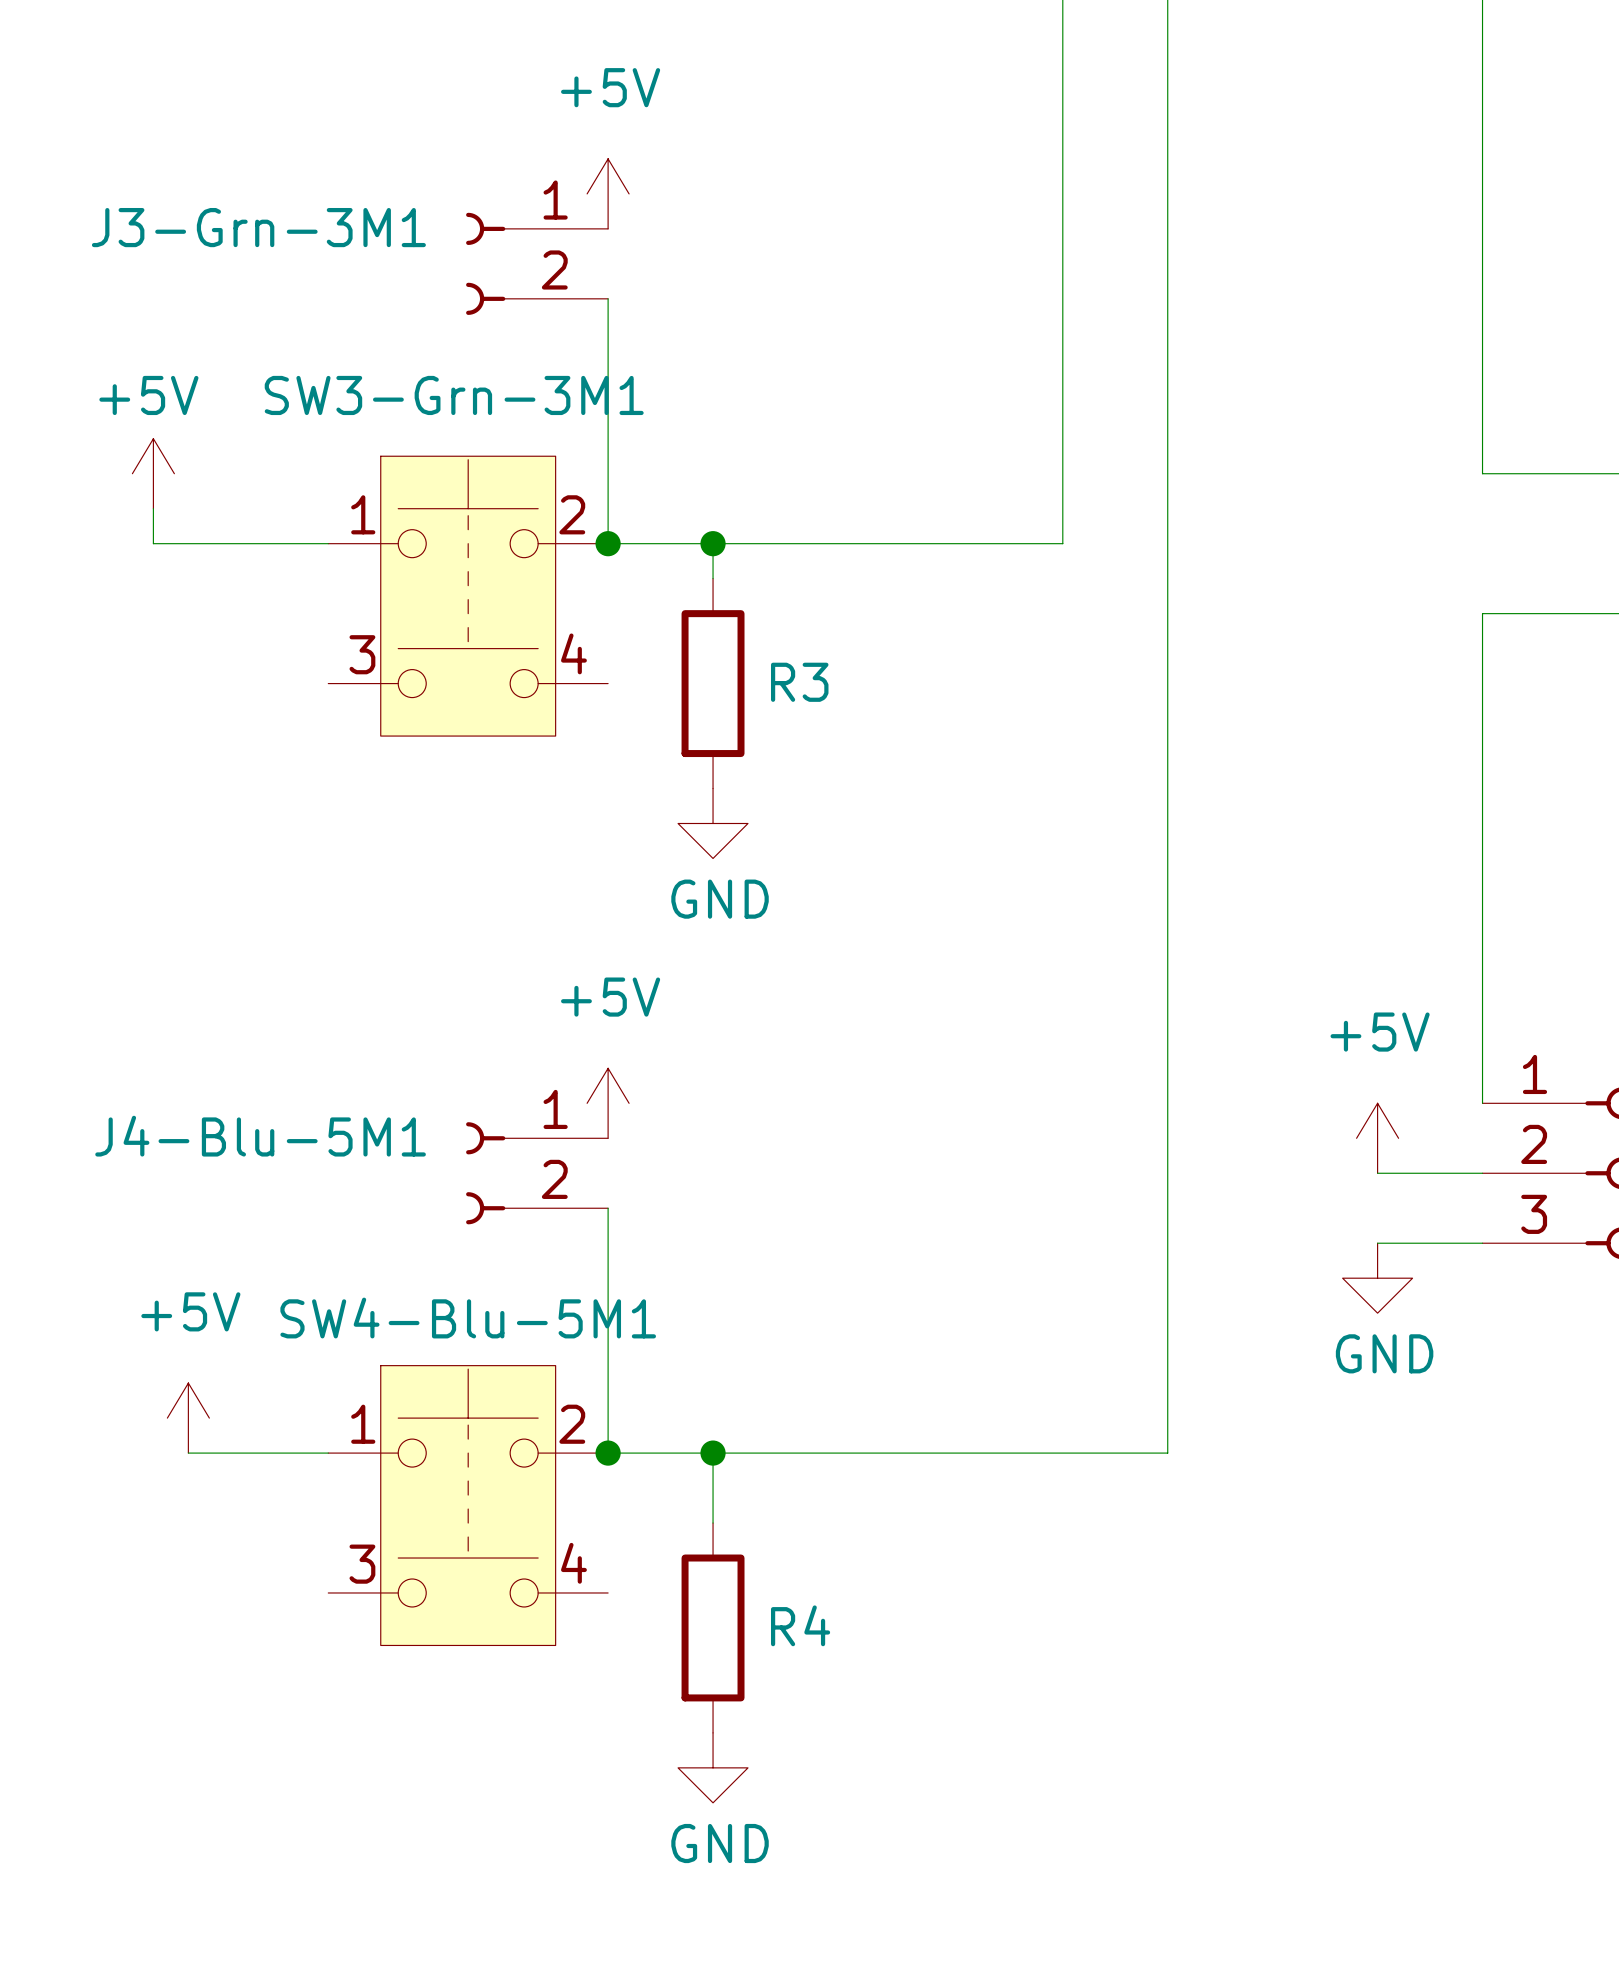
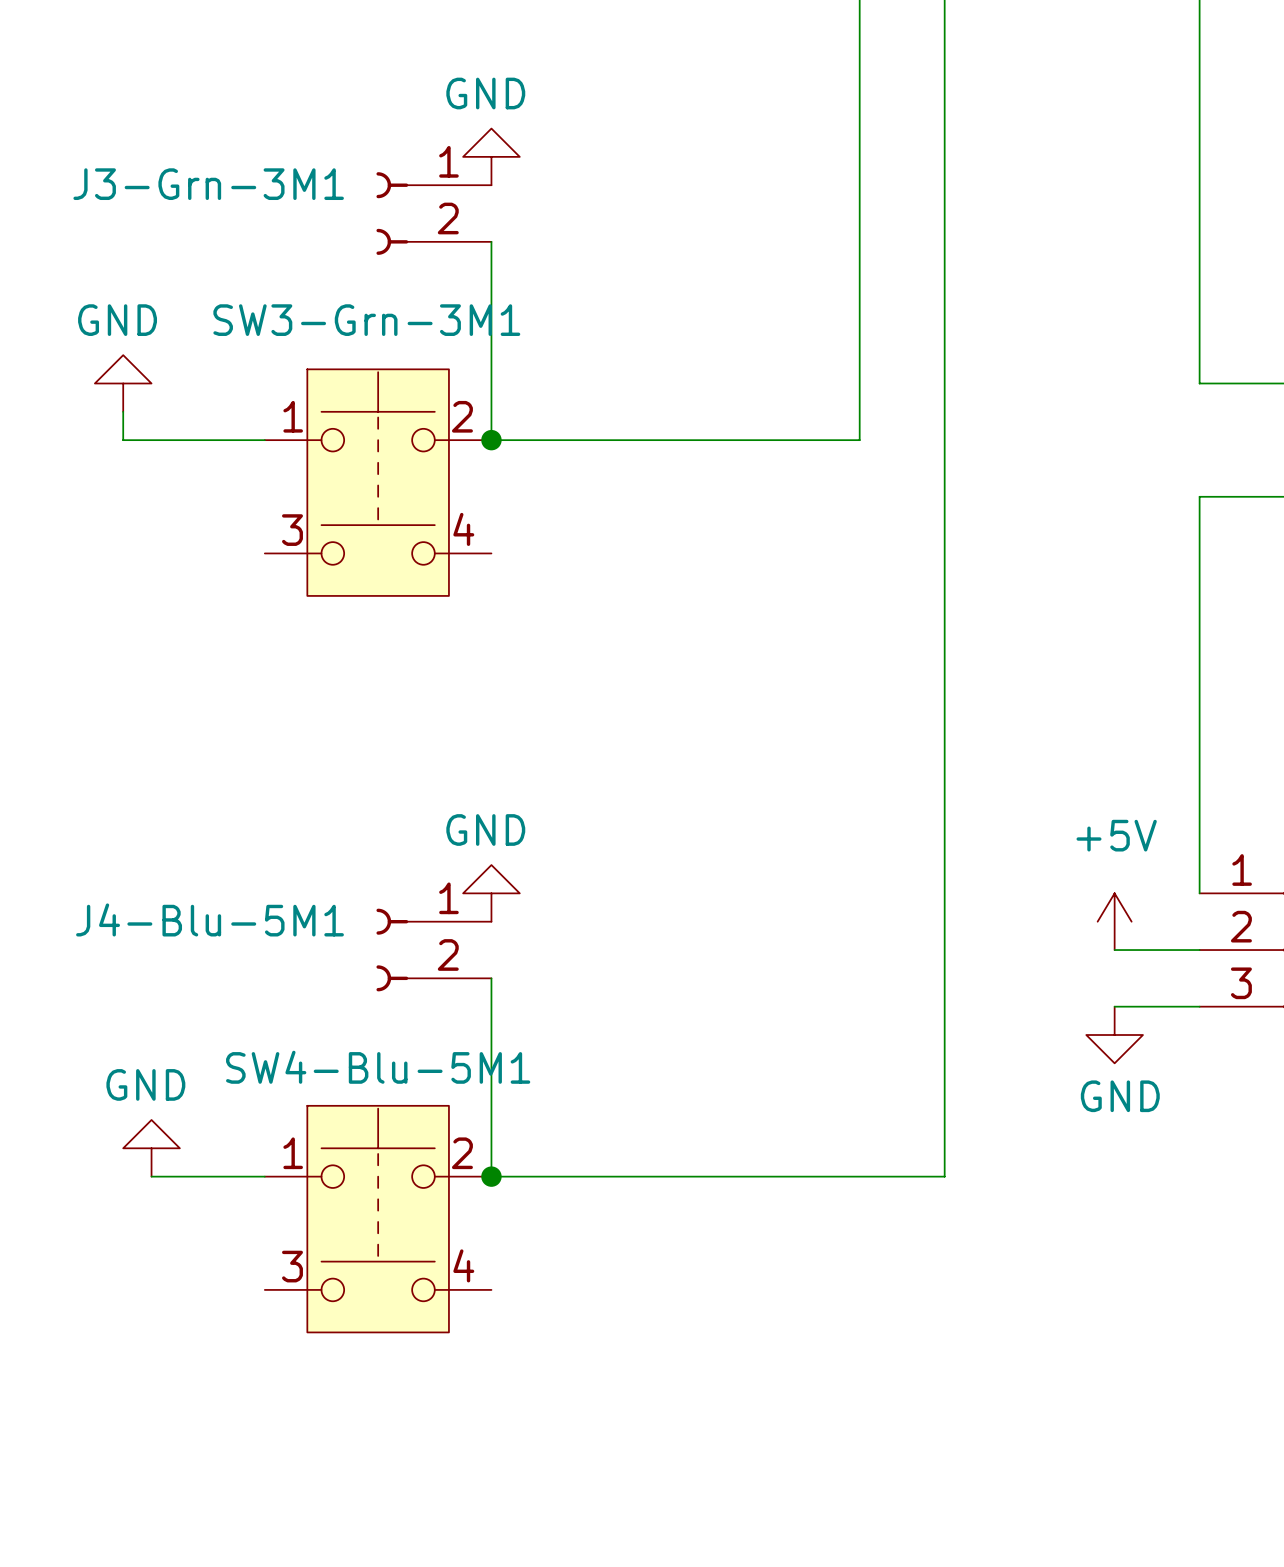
power symbol: +5V (608, 193) -> GND (491, 156)
power symbol: +5V (153, 473) -> GND (123, 383)
wire: (713, 543) (713, 578) -> none
junction: (713, 543) -> none
R3: (713, 683) -> none
power symbol: GND (713, 823) -> none
power symbol: +5V (608, 1103) -> GND (491, 893)
power symbol: +5V (188, 1418) -> GND (151, 1148)
wire: (713, 1453) (713, 1523) -> none
junction: (713, 1453) -> none
R4: (713, 1627) -> none
power symbol: GND (713, 1767) -> none

